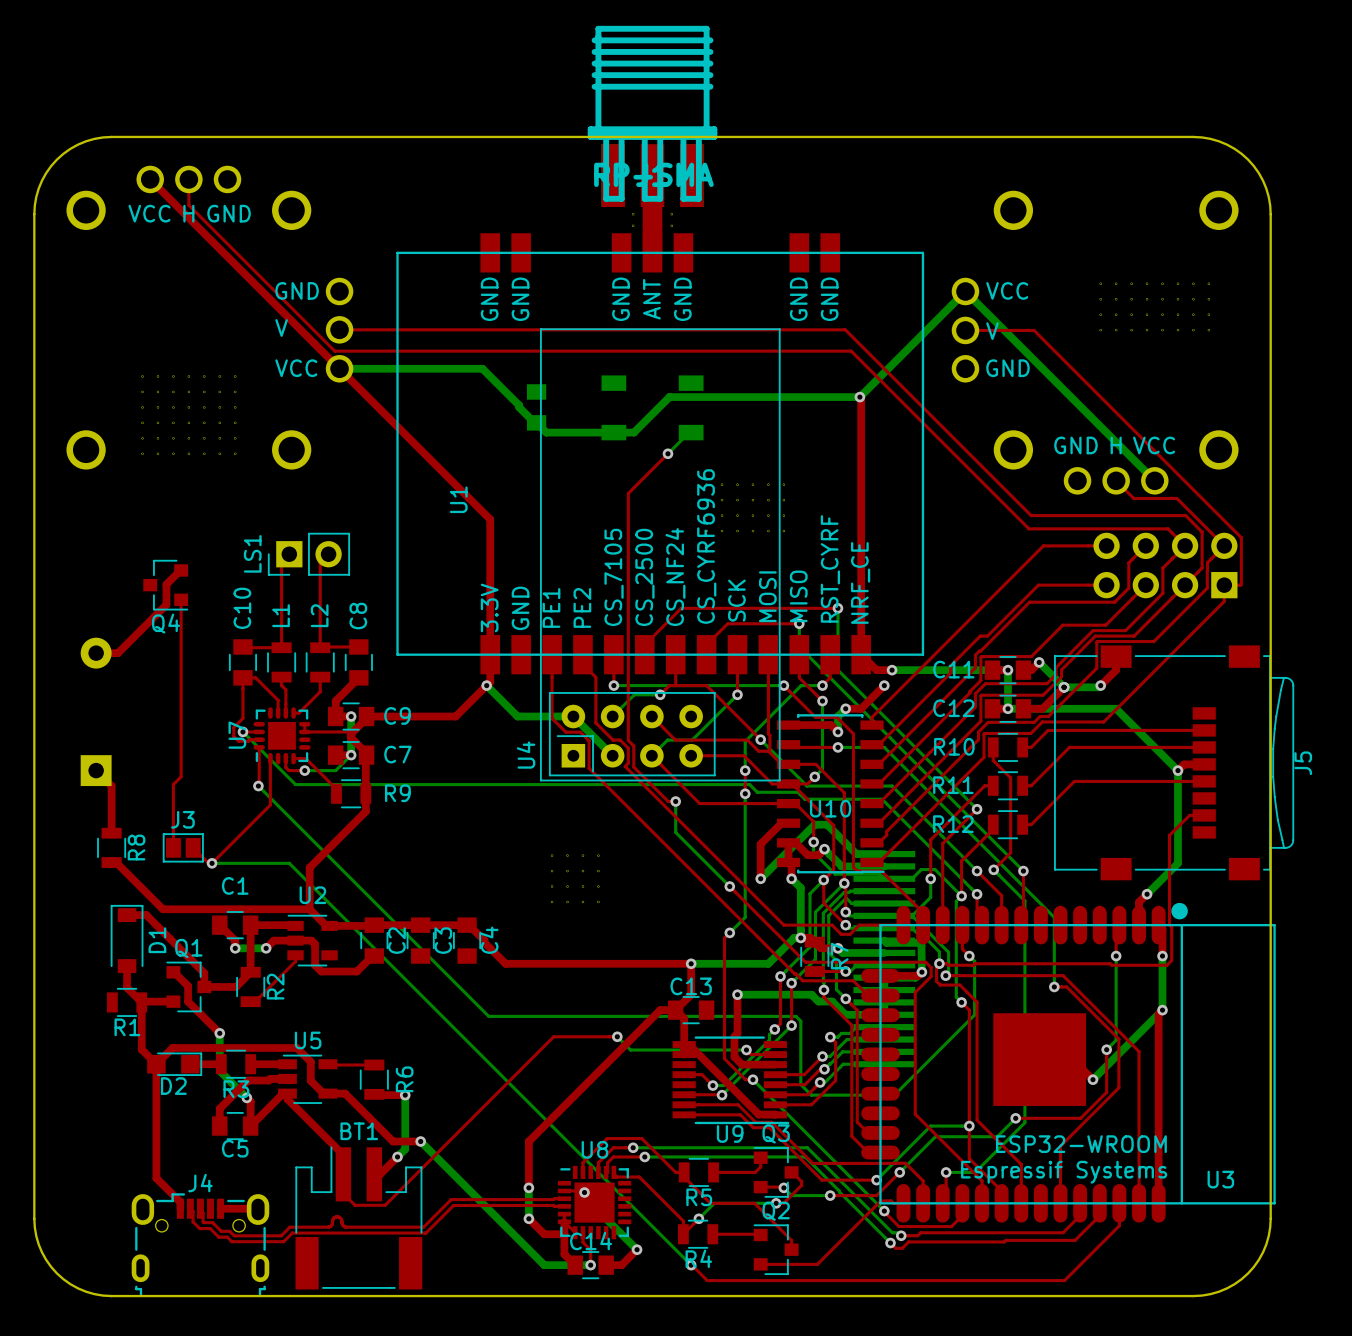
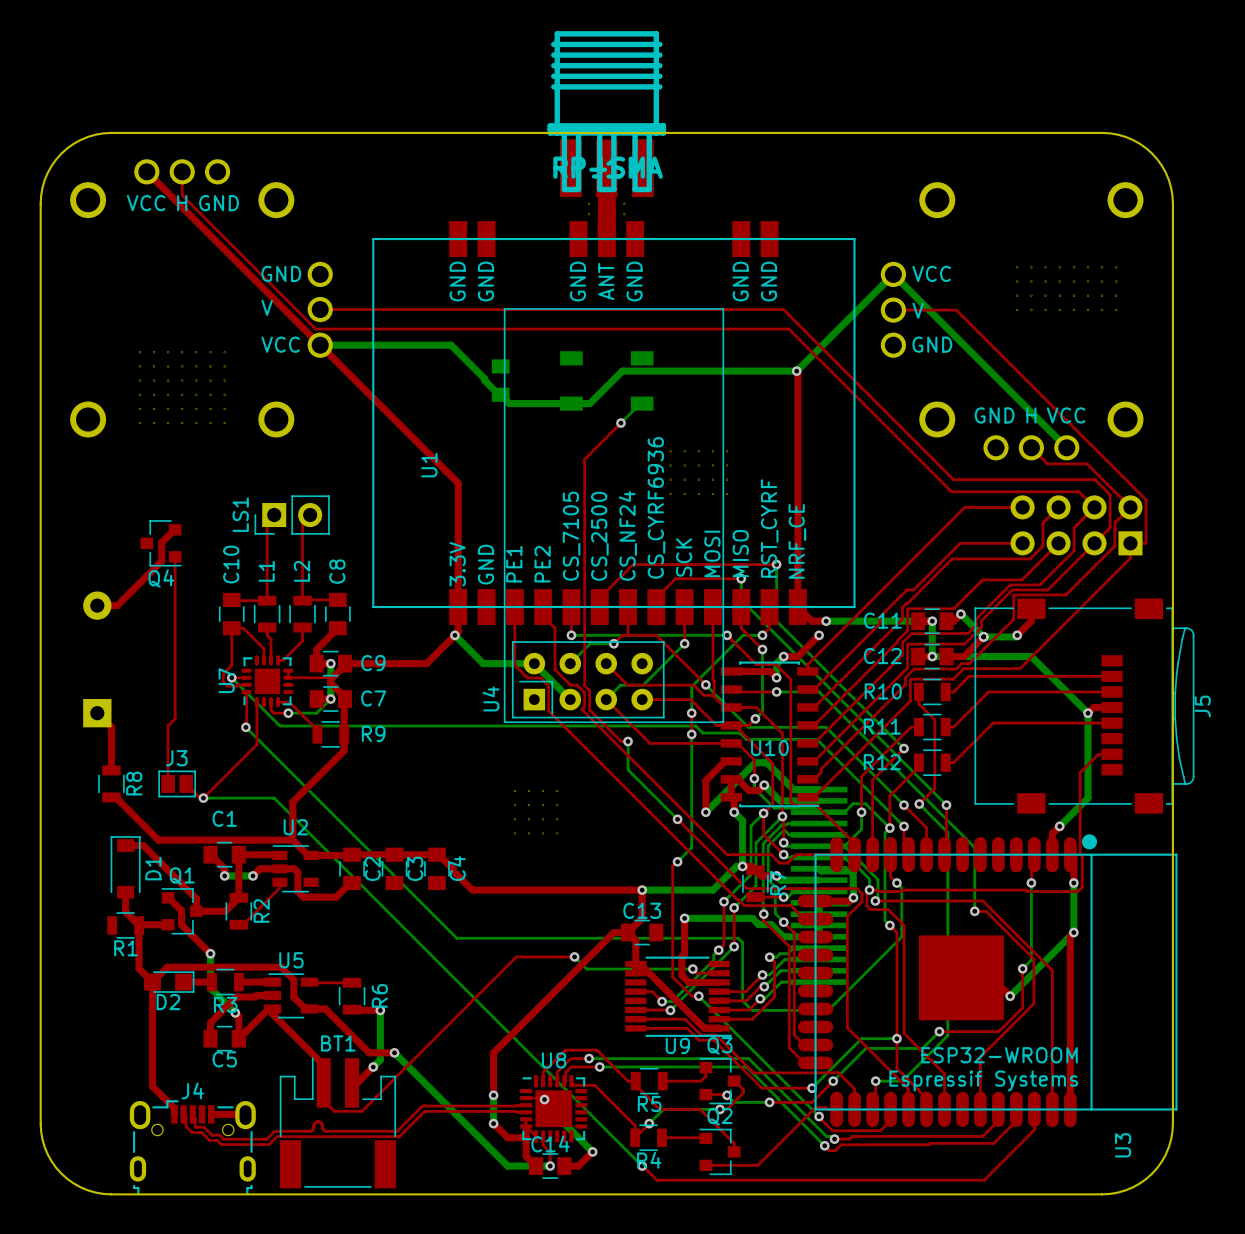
U3 name rotation: 0° (1220, 1179) -> 90° counterclockwise (1123, 1145)
U3 name position: U3 (1220, 1179) -> U3 (1123, 1145)

